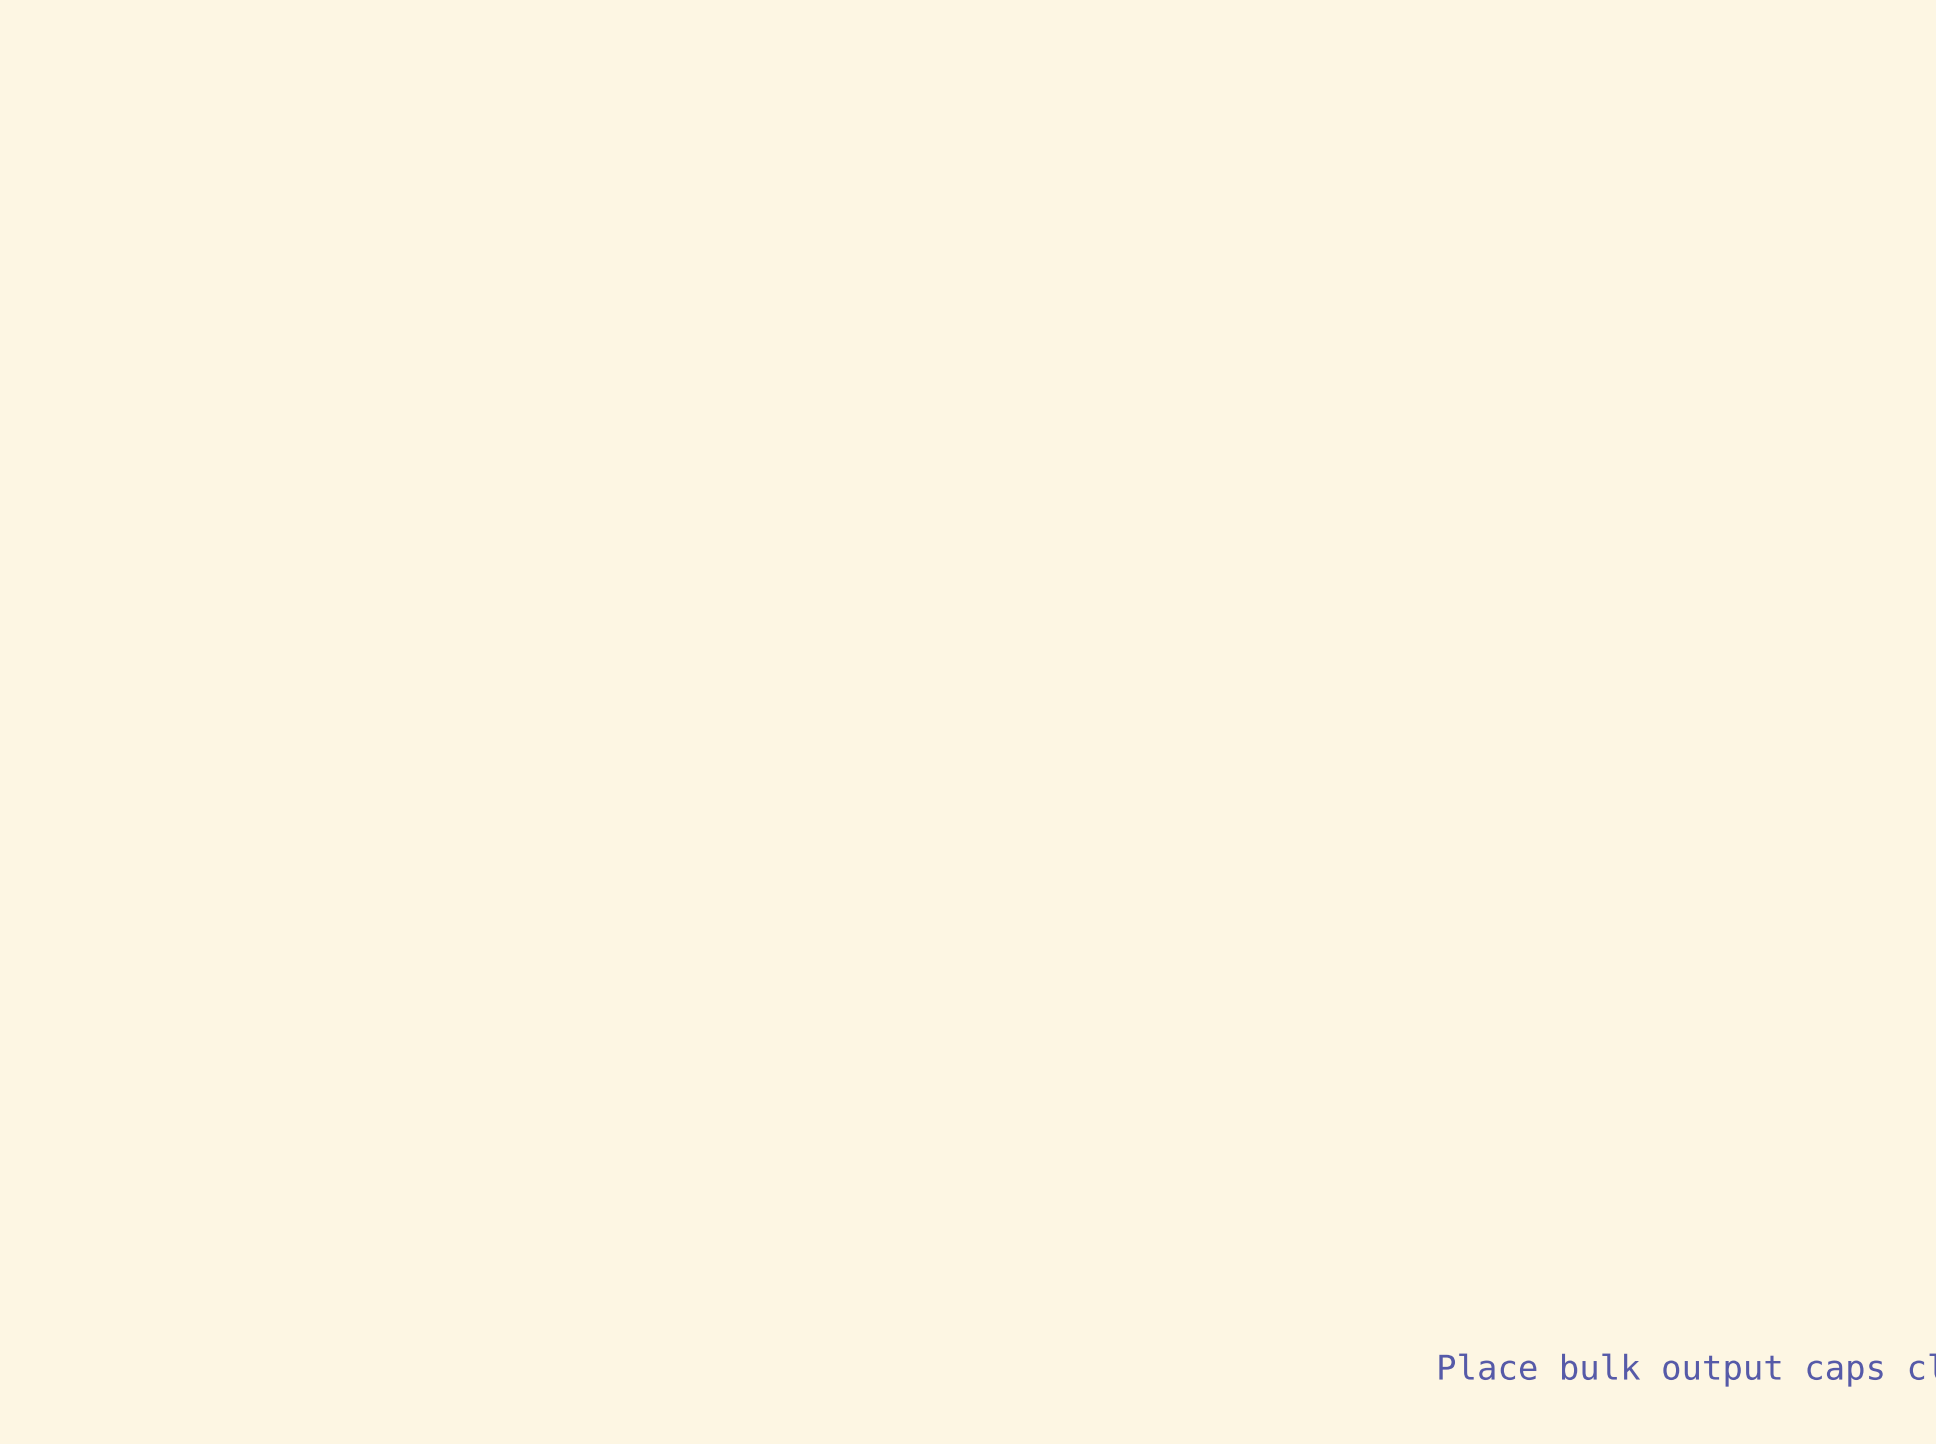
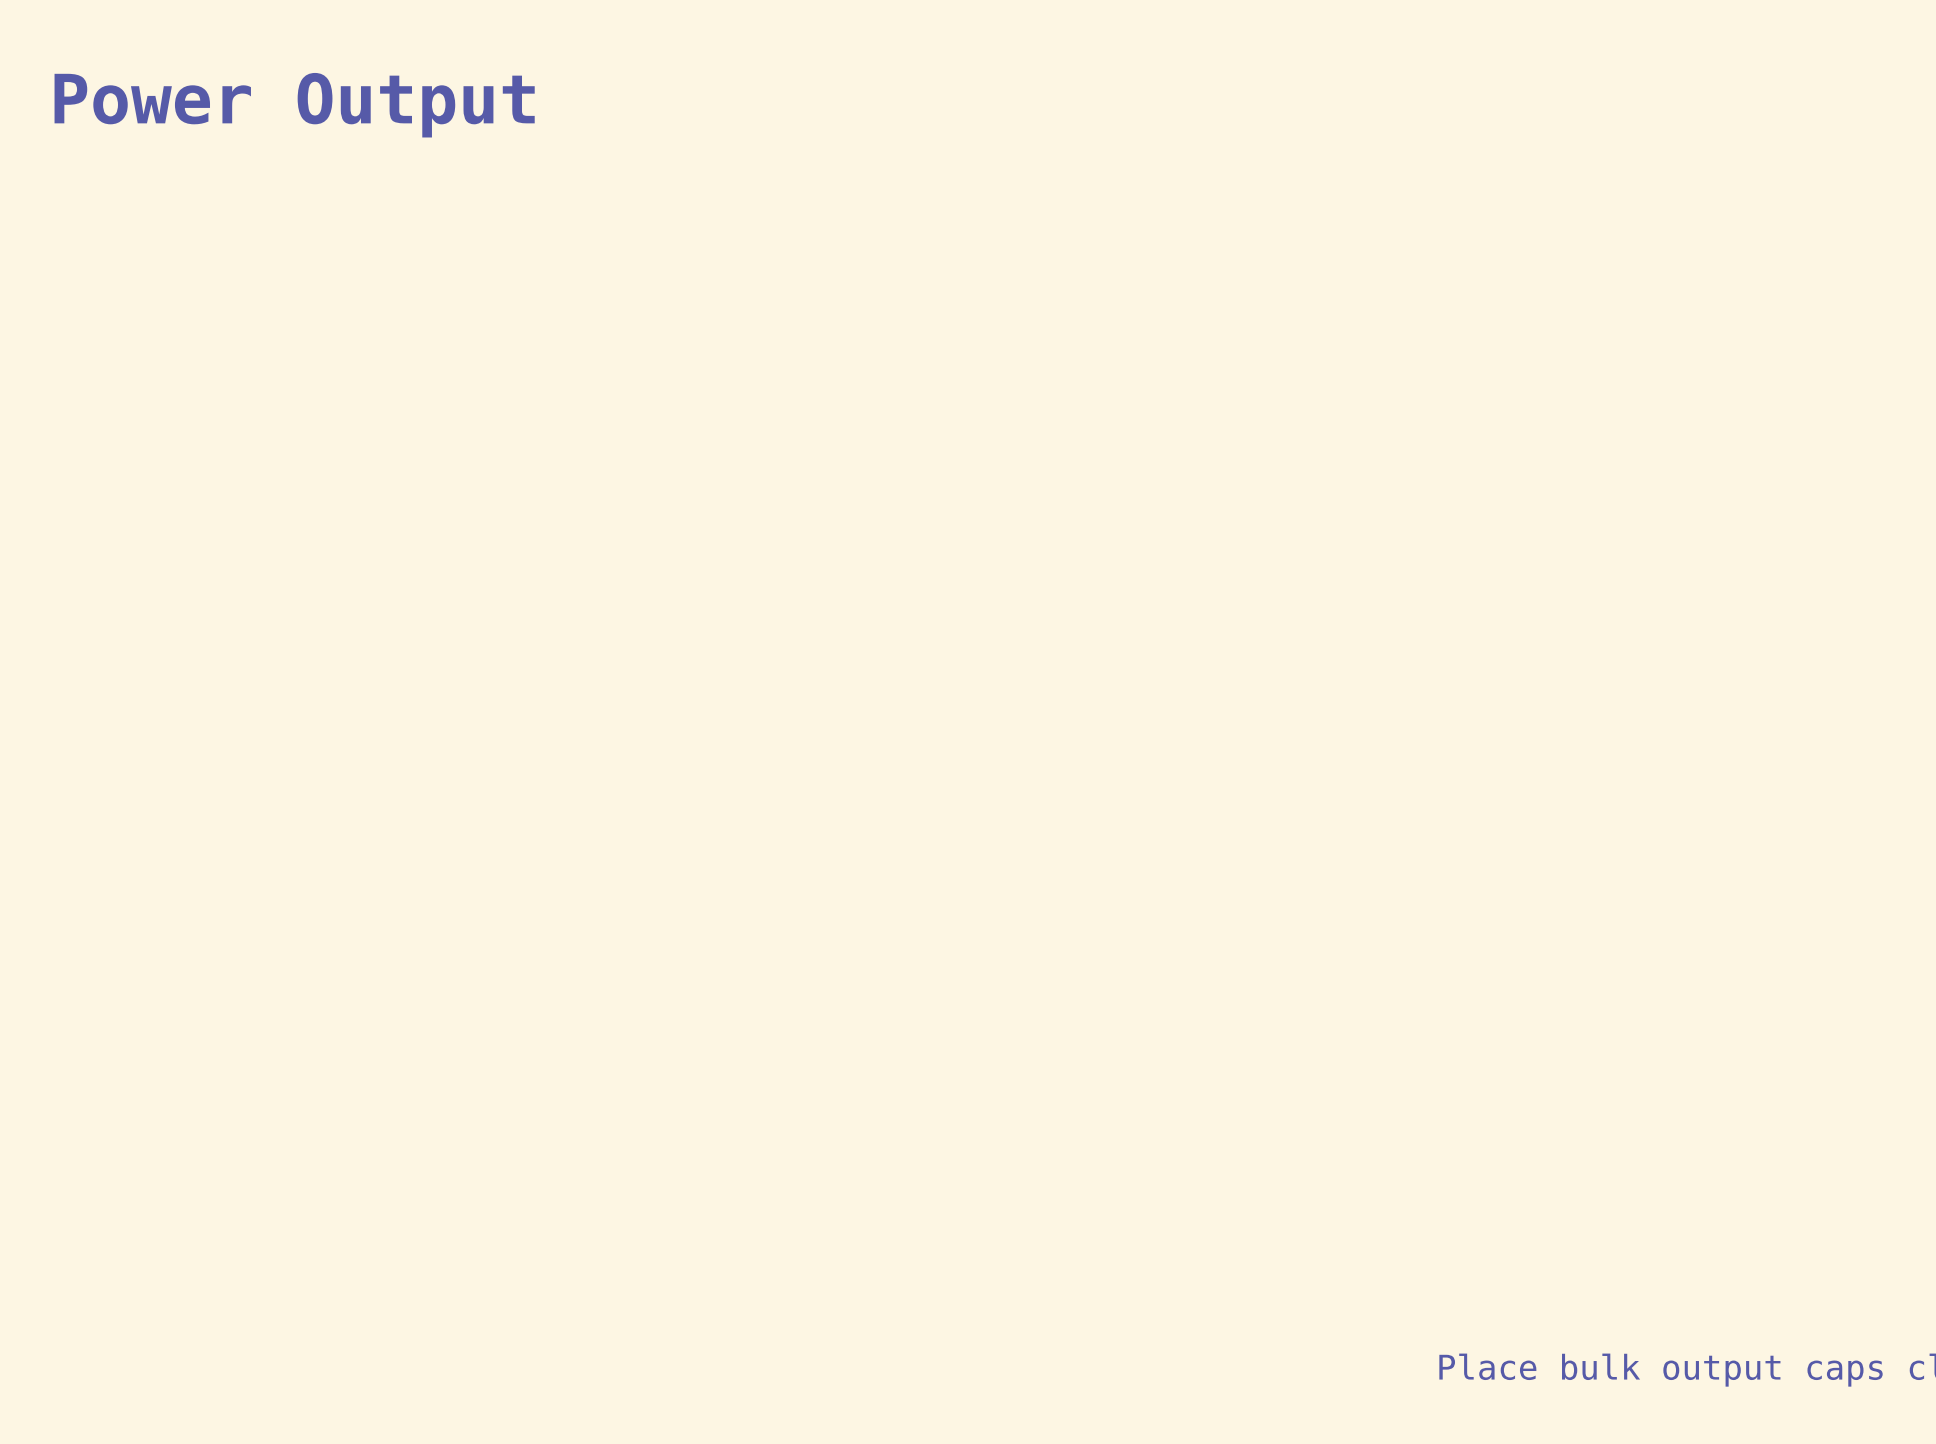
text: none -> Power Output (294, 105)

